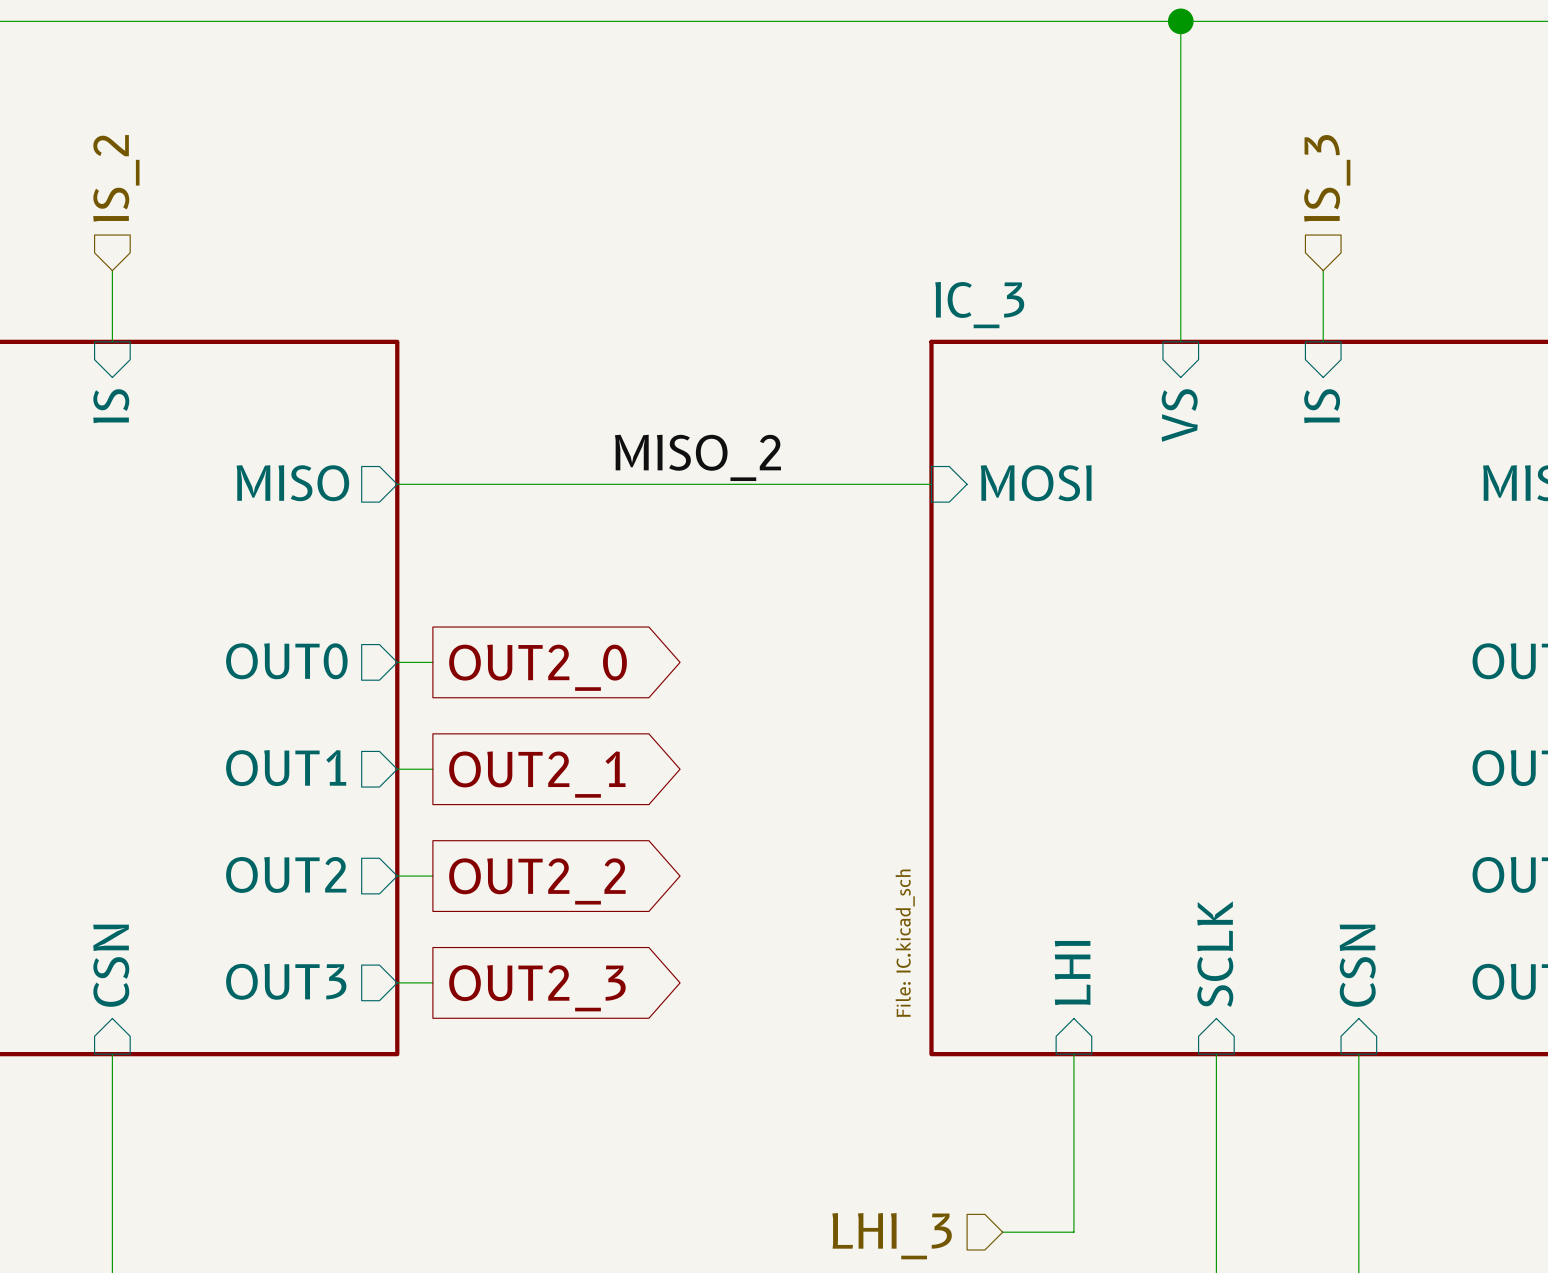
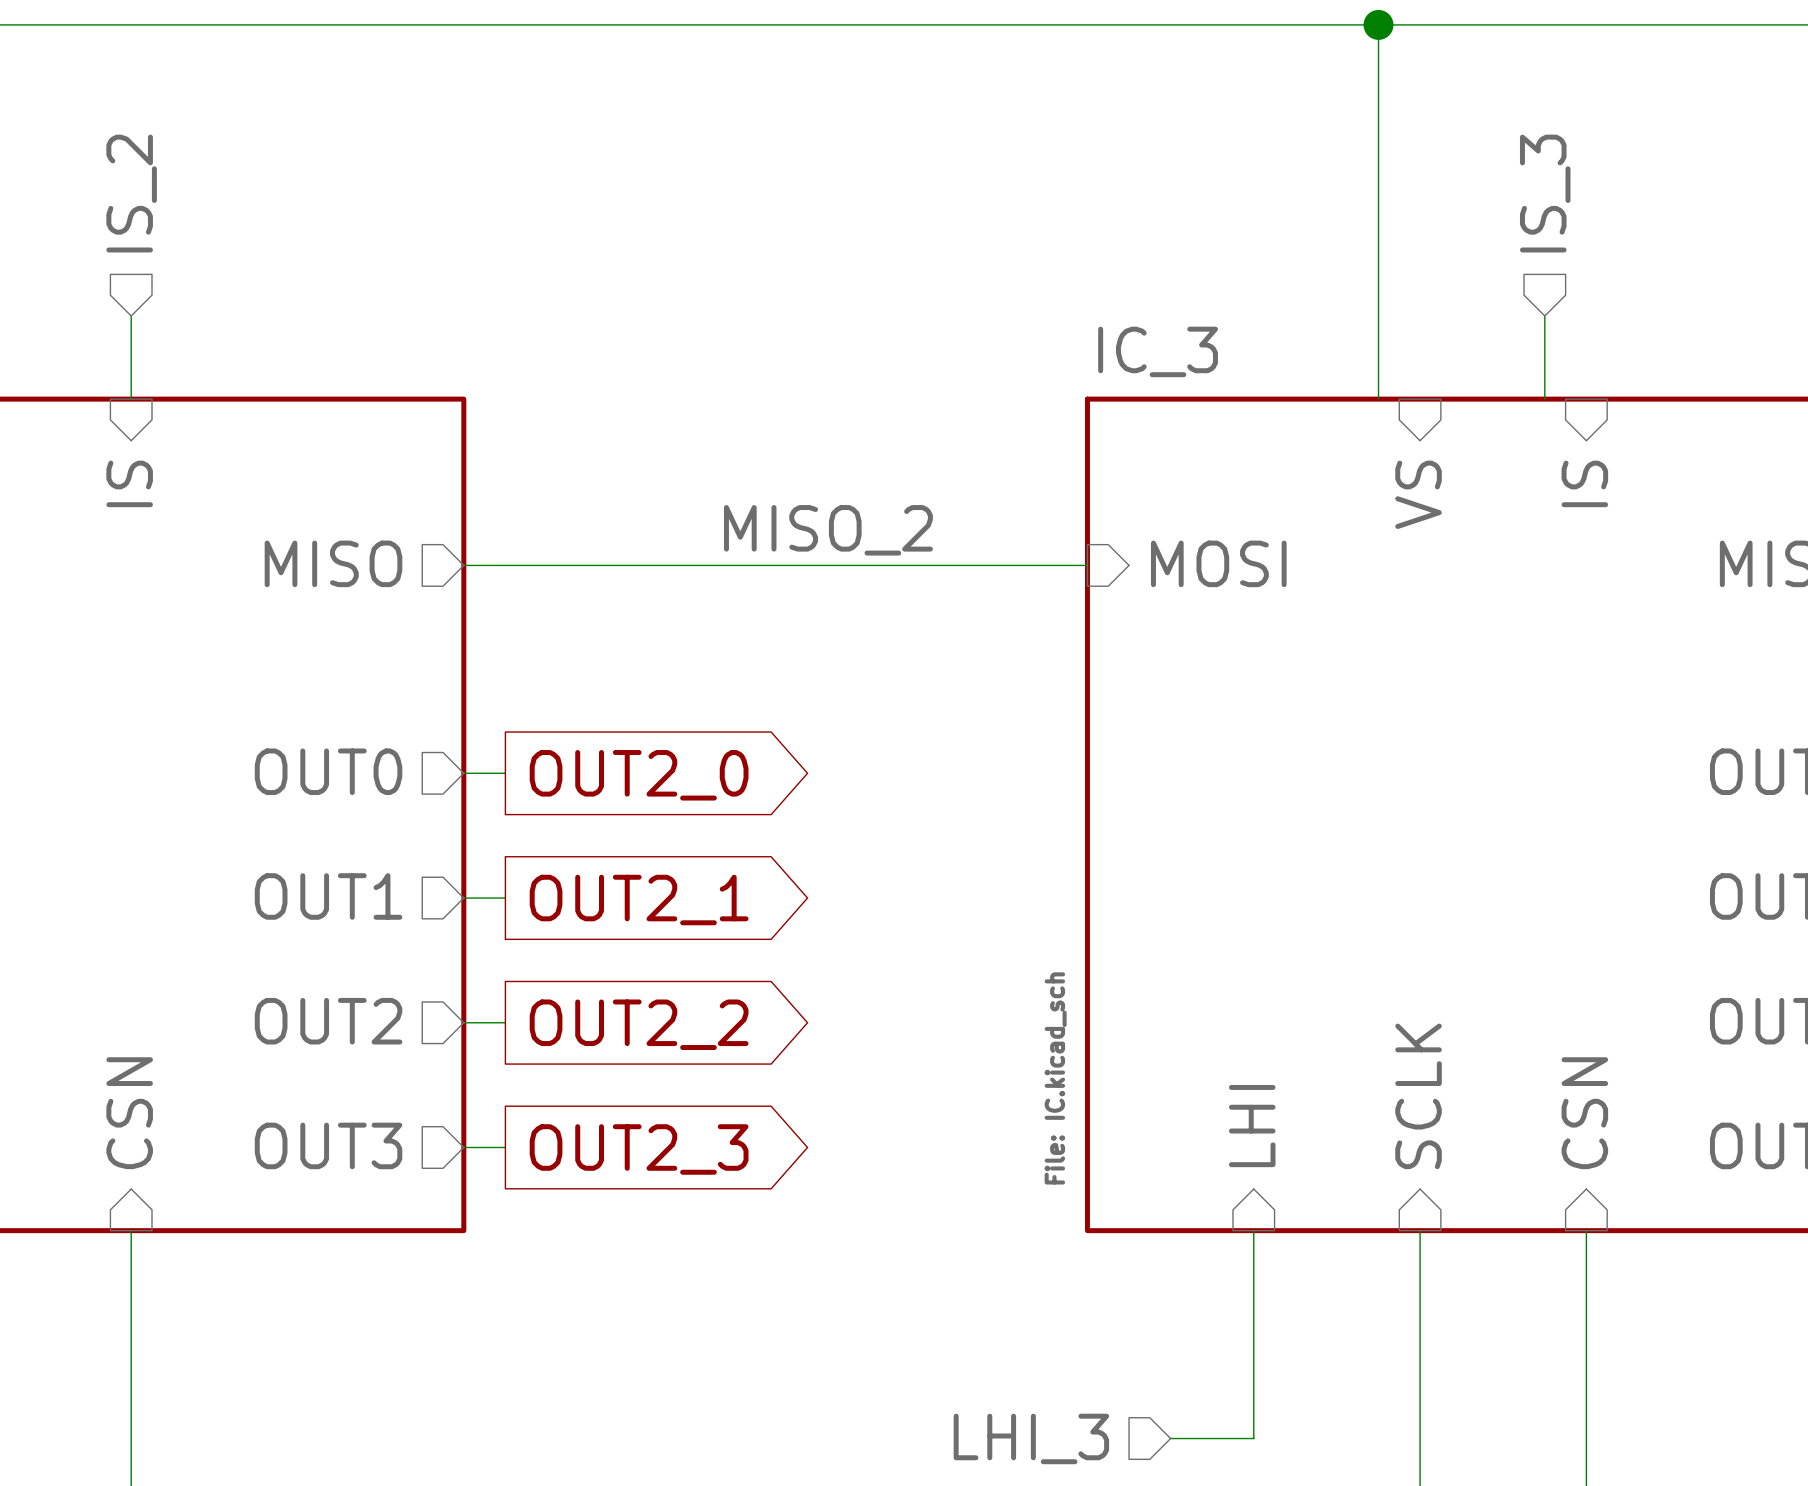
sheet pin position: IS (1322, 406) -> IS (1584, 483)
sheet pin position: VS (1179, 415) -> VS (1418, 494)

